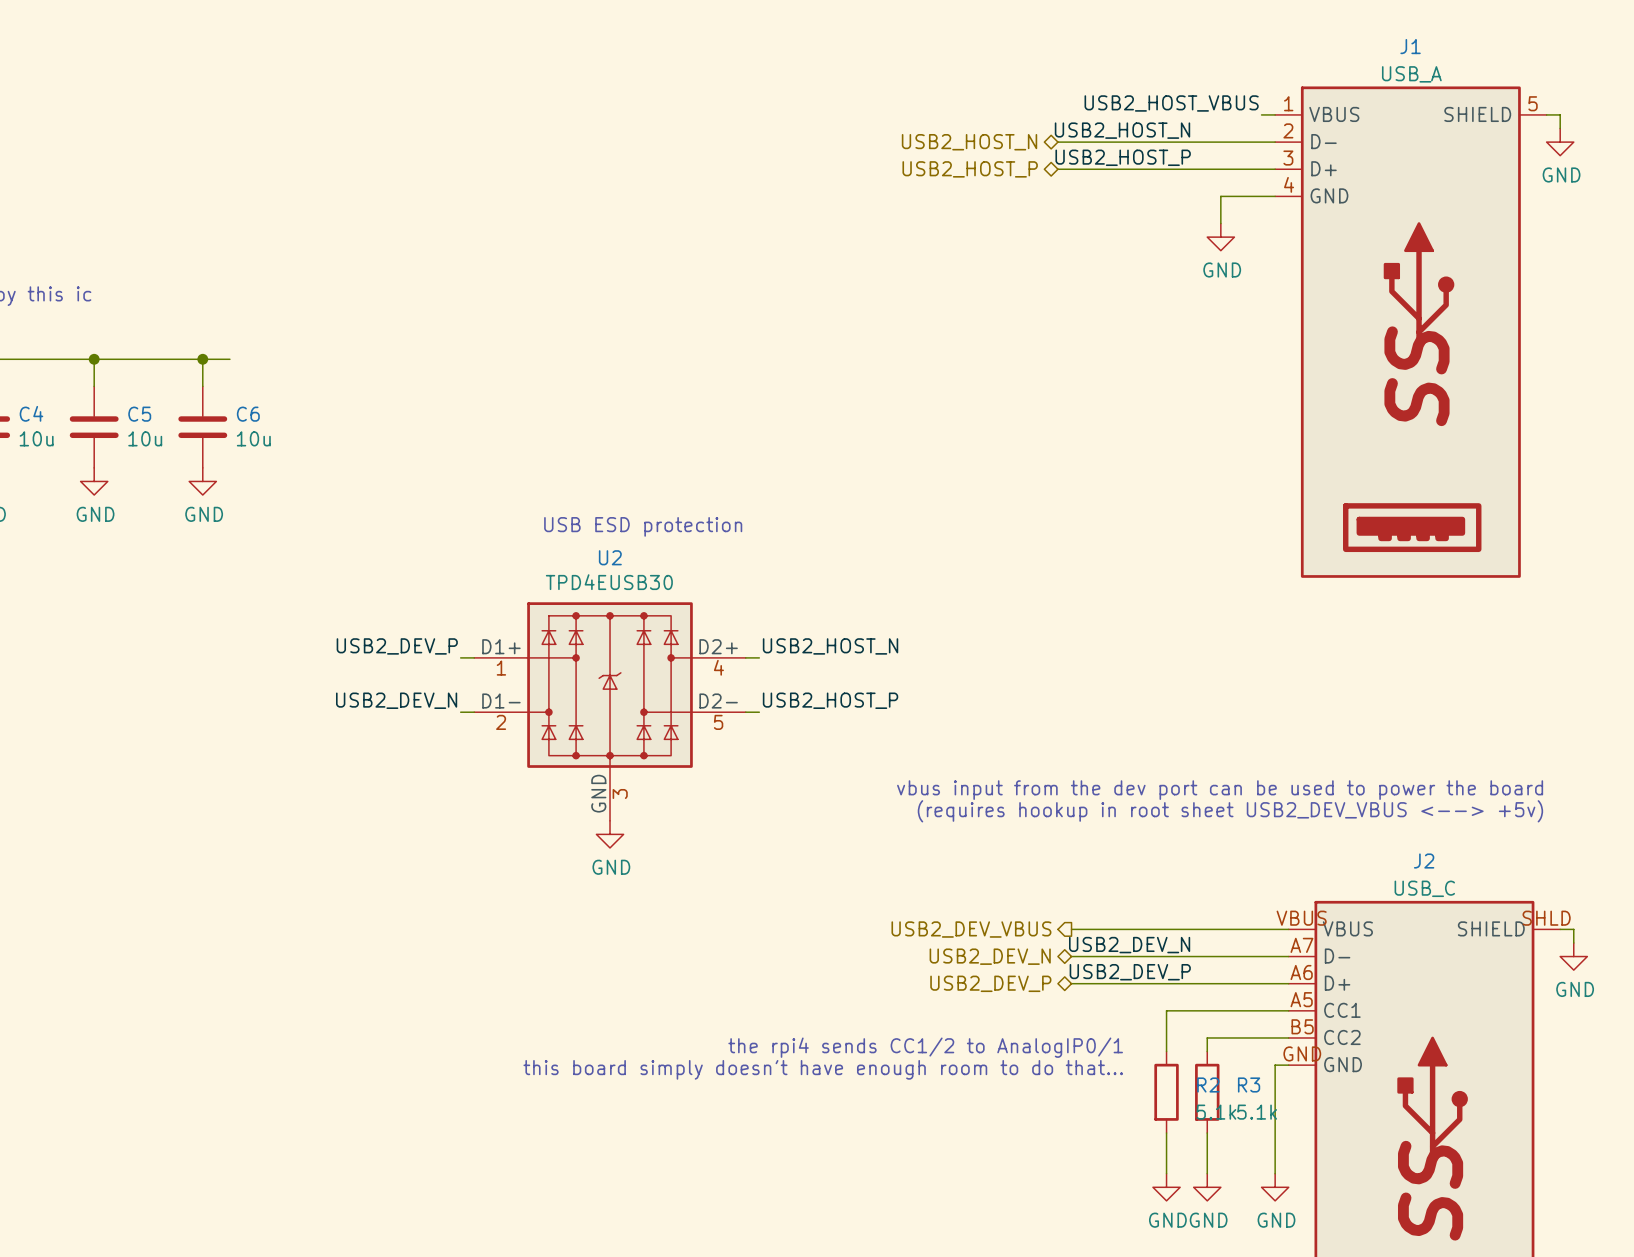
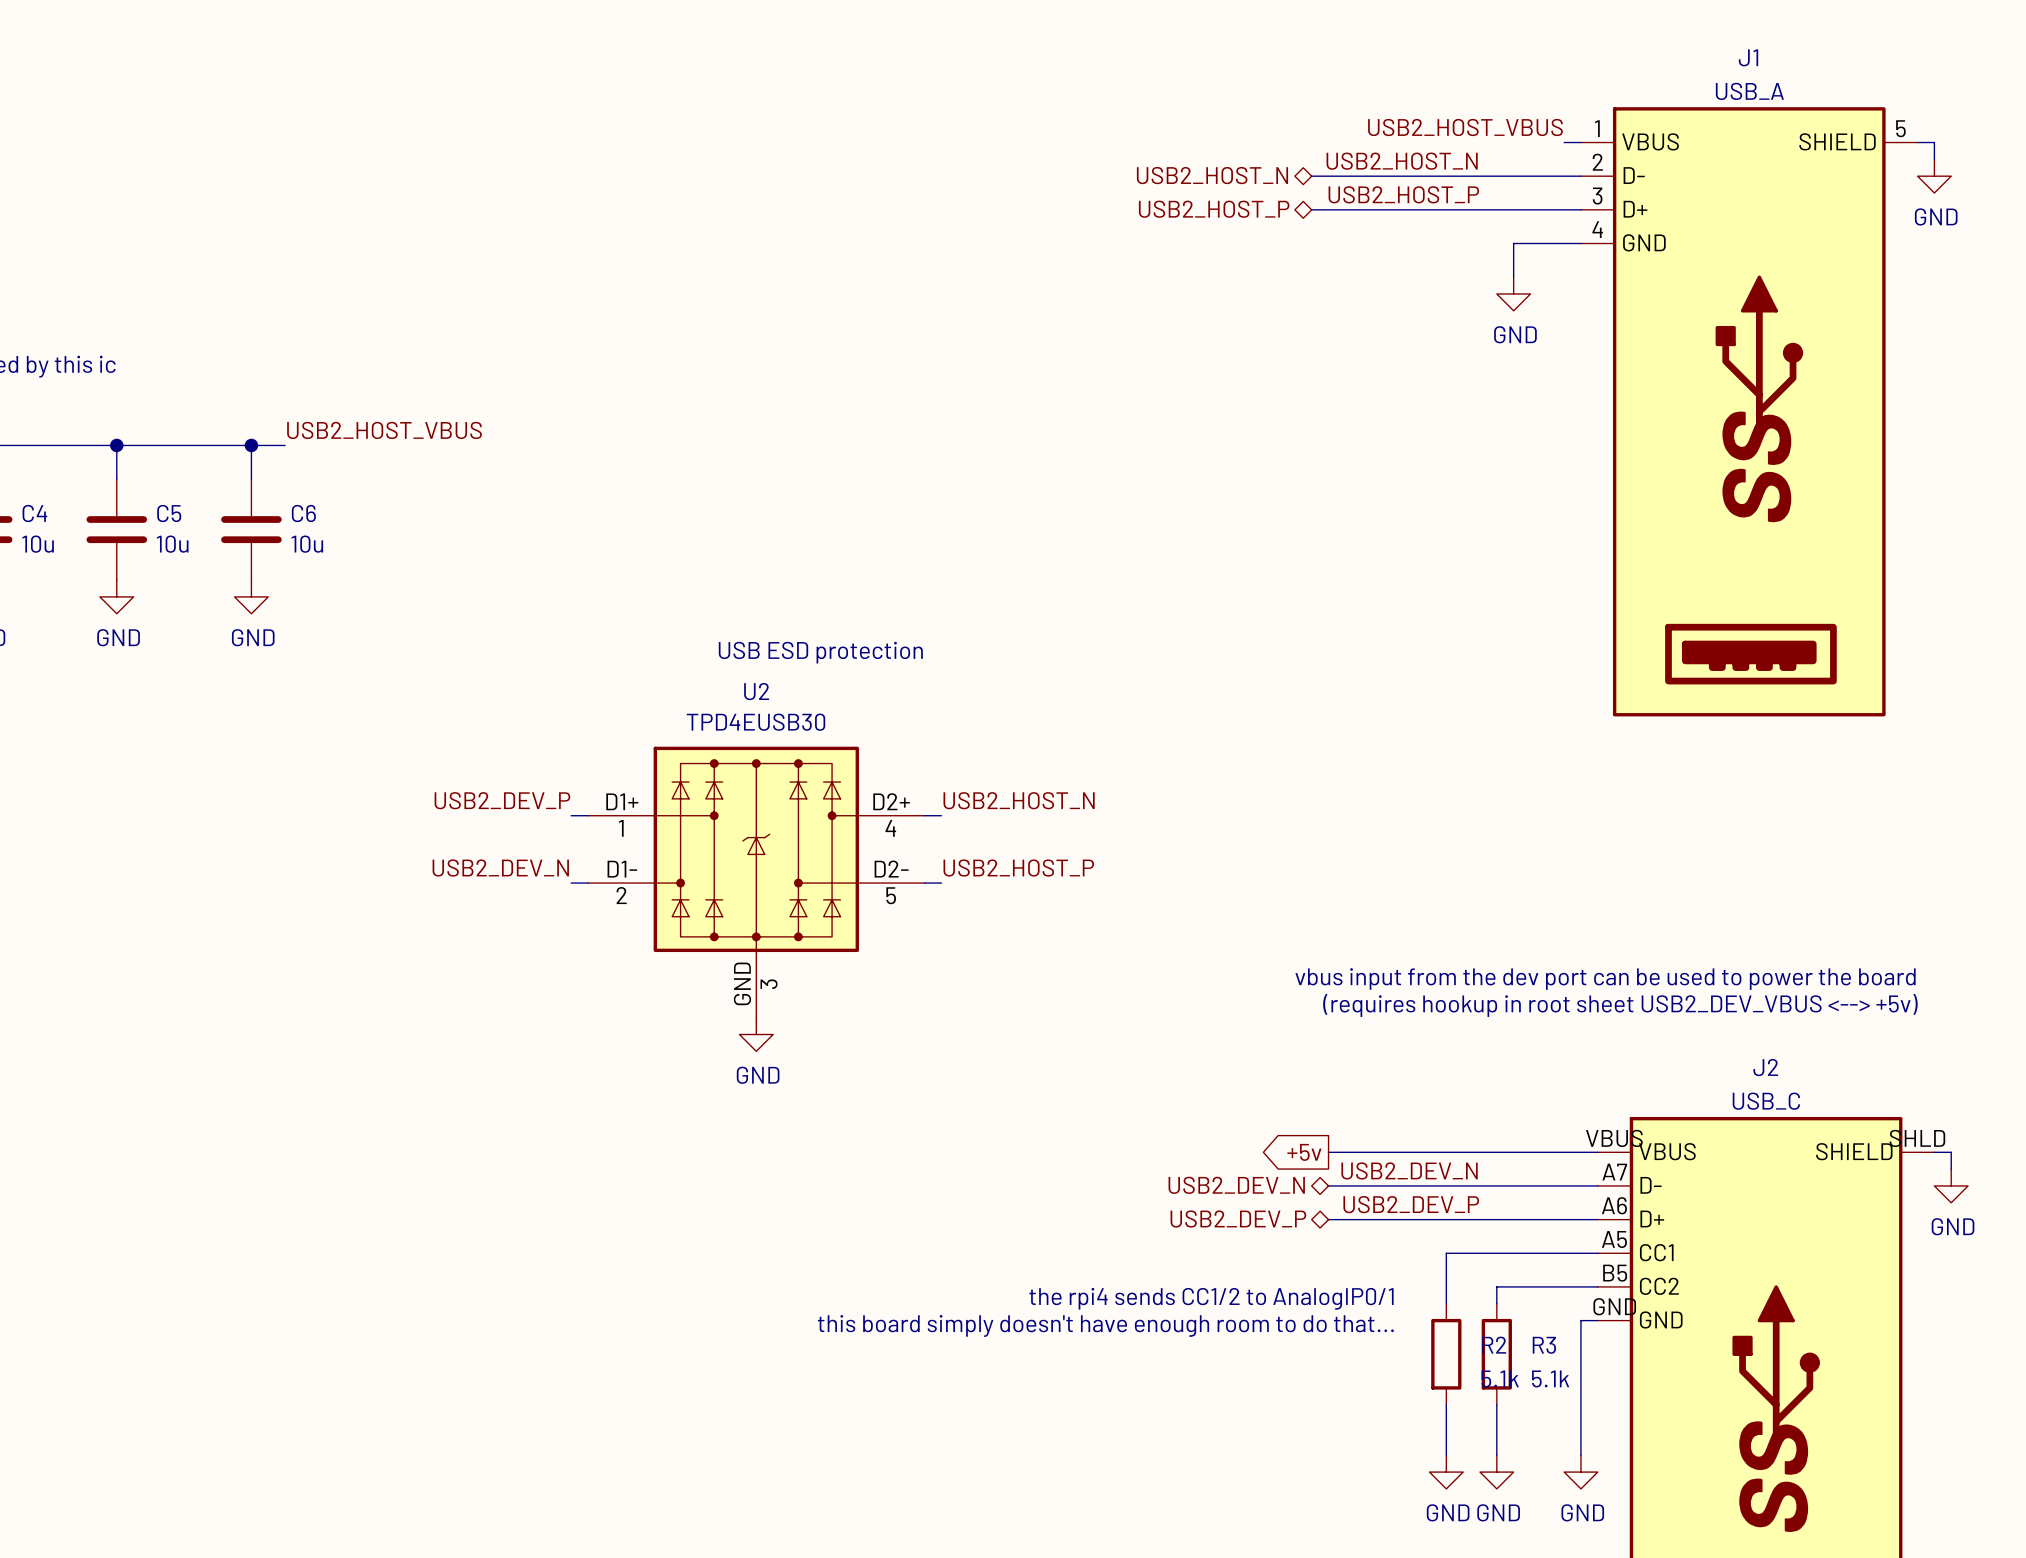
label: none -> USB2_HOST_VBUS (384, 430)
hierarchical label: USB2_DEV_VBUS (971, 929) -> none
global label: none -> +5v (1304, 1152)

